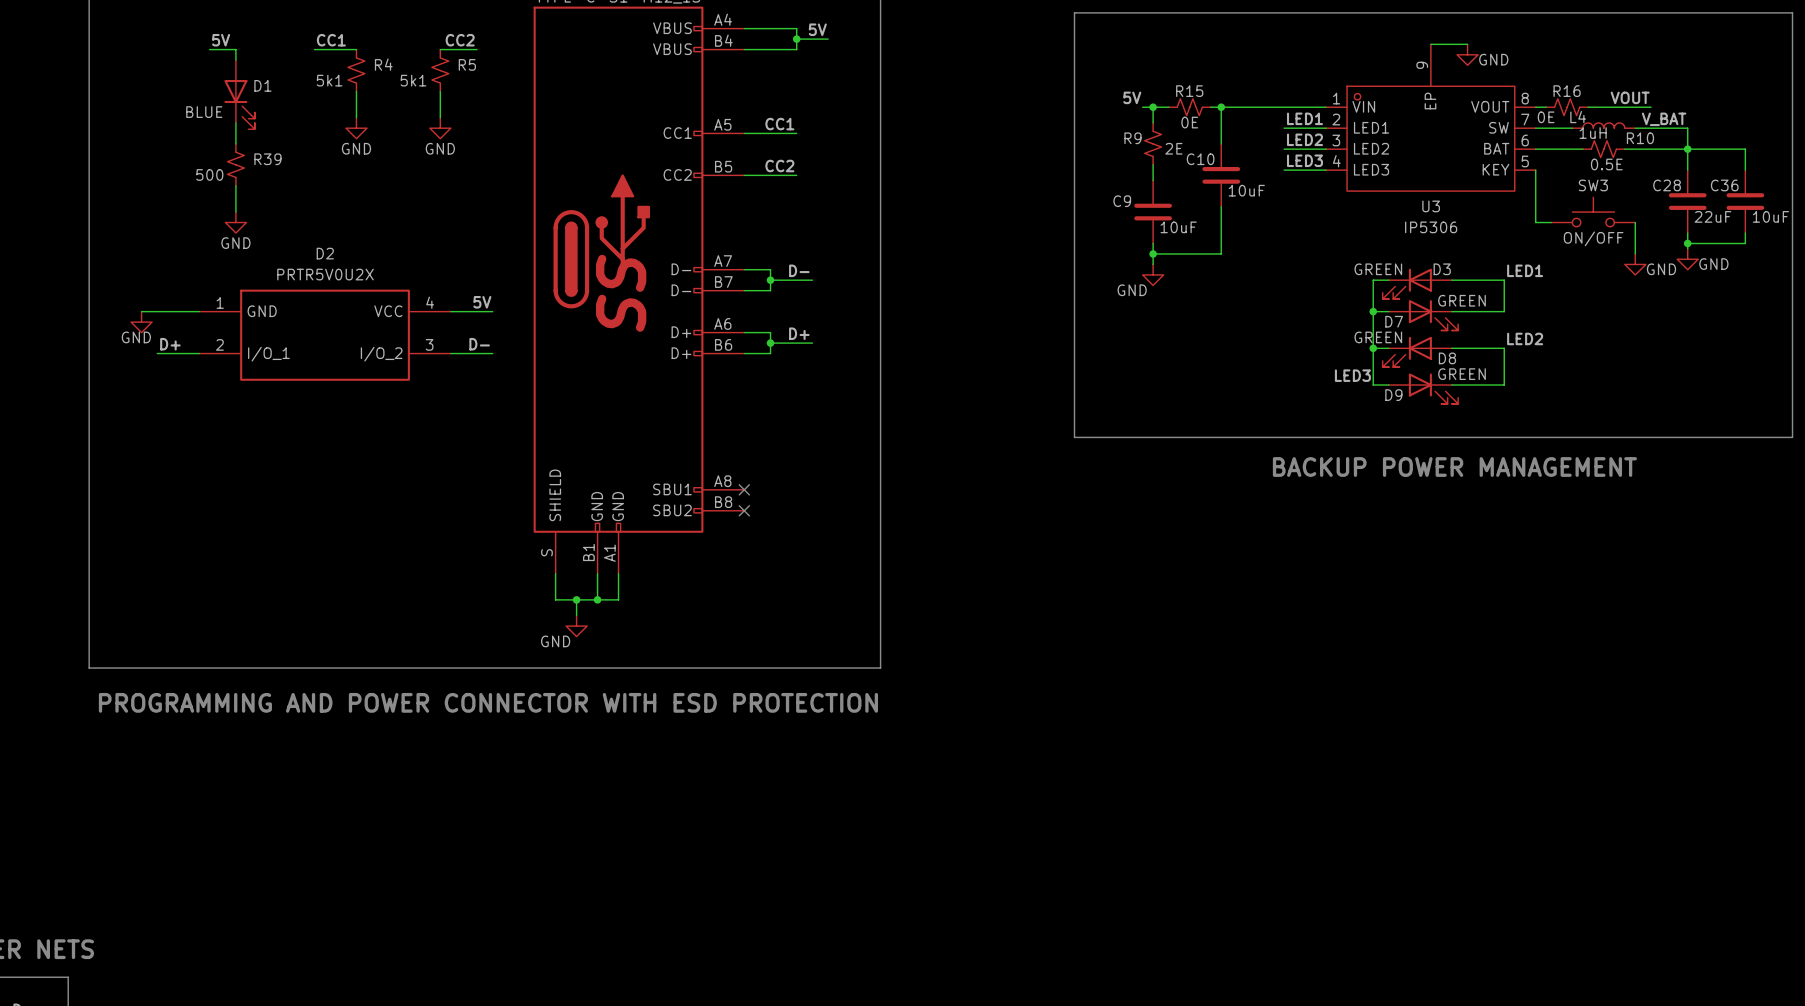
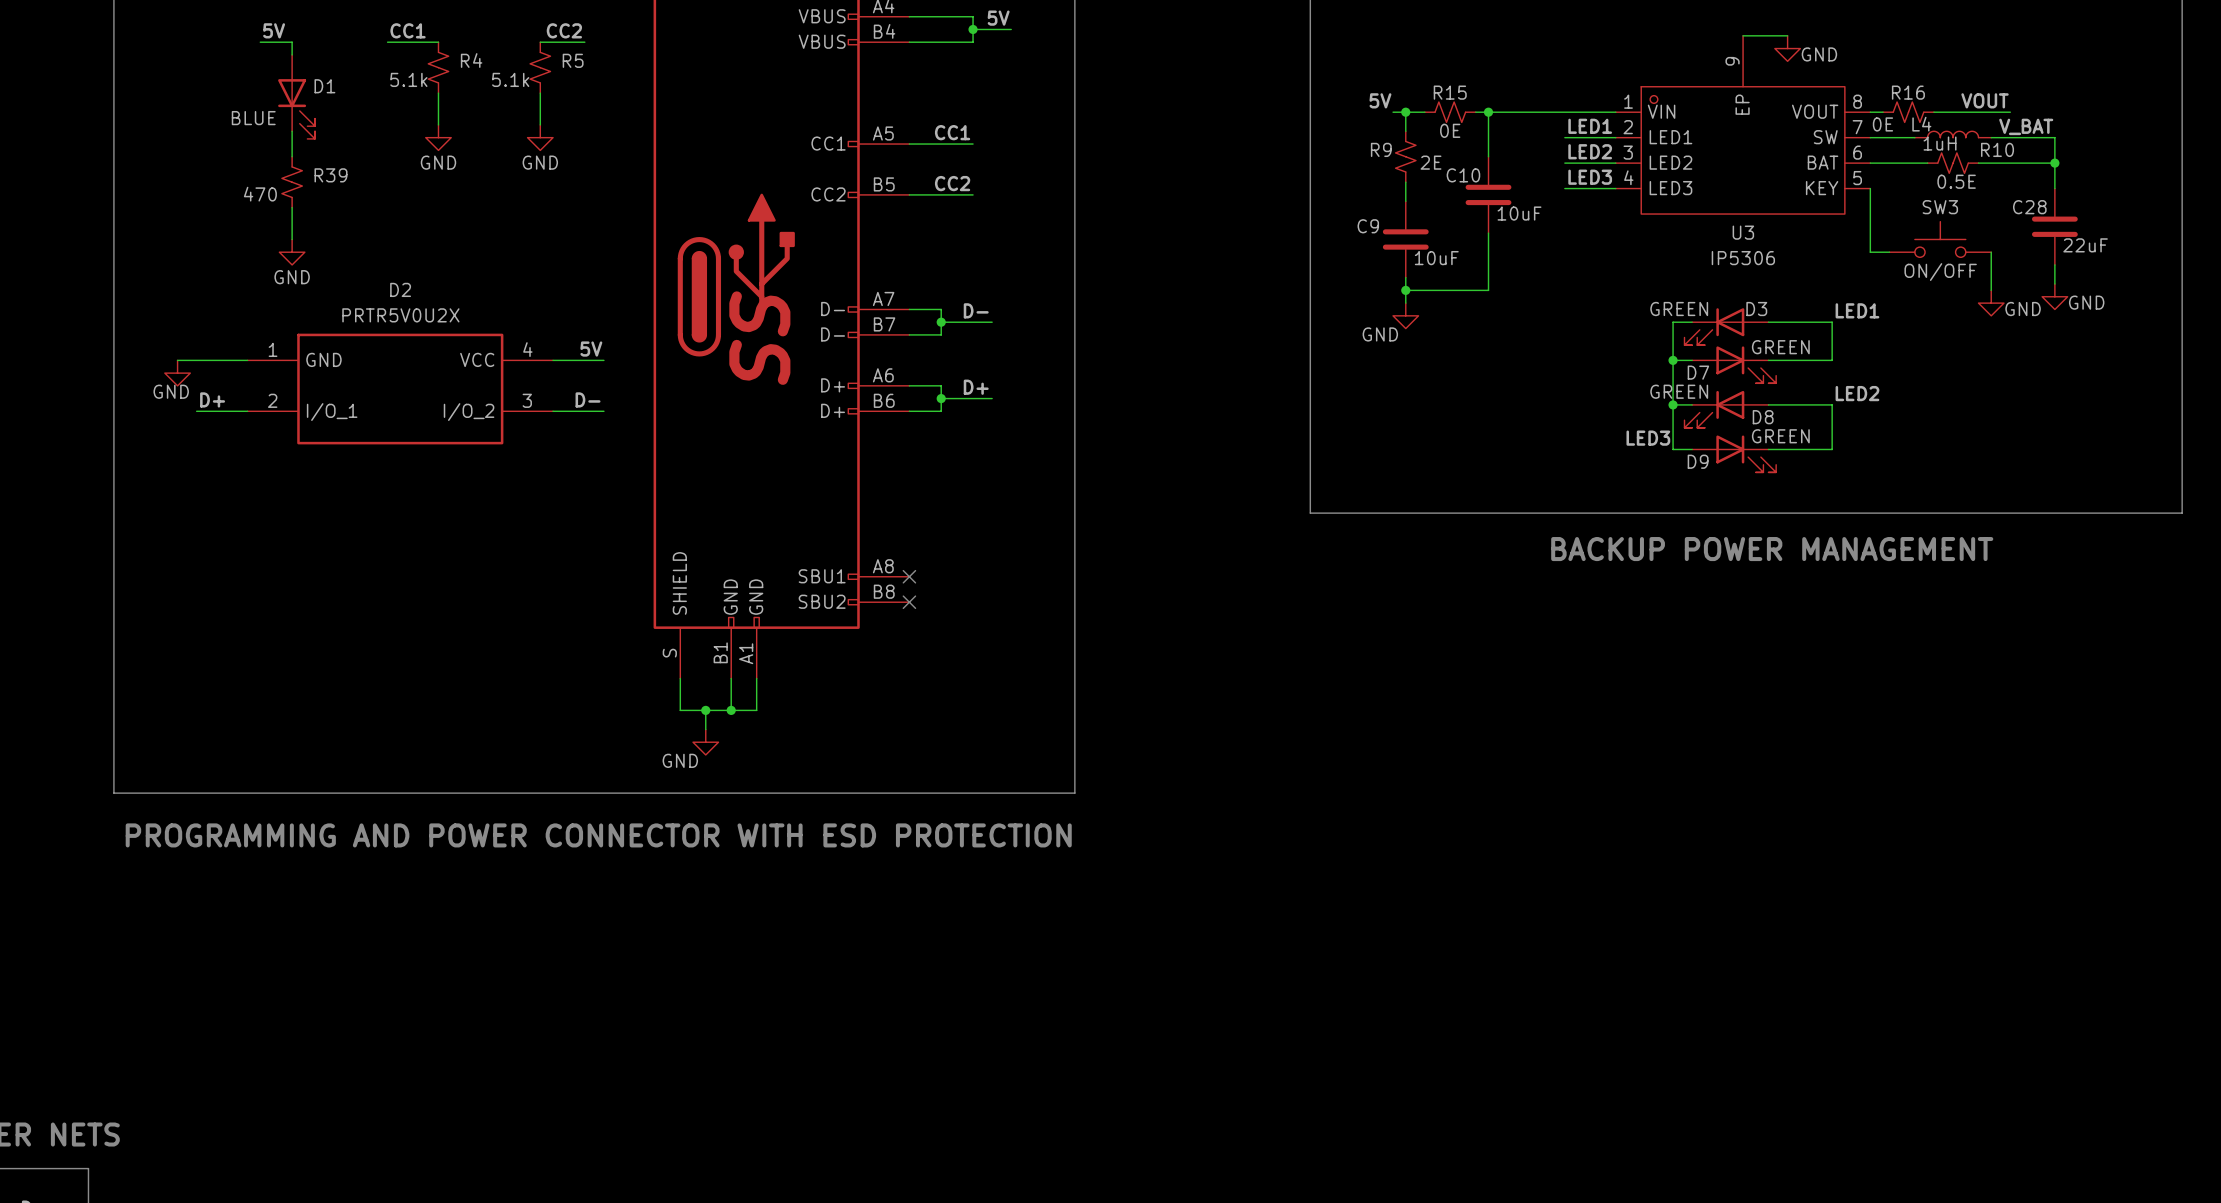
R4 value: 5k1 (329, 80) -> 5.1k (408, 79)
R5 value: 5k1 (413, 80) -> 5.1k (510, 79)
wire: (1687, 149) (1745, 149) (1745, 170) -> none
R39 value: 500 (209, 174) -> 470 (260, 194)
C36: 10uF (1745, 201) -> none
wire: (1745, 233) (1745, 243) (1687, 243) -> none
junction: (1687, 243) -> none

